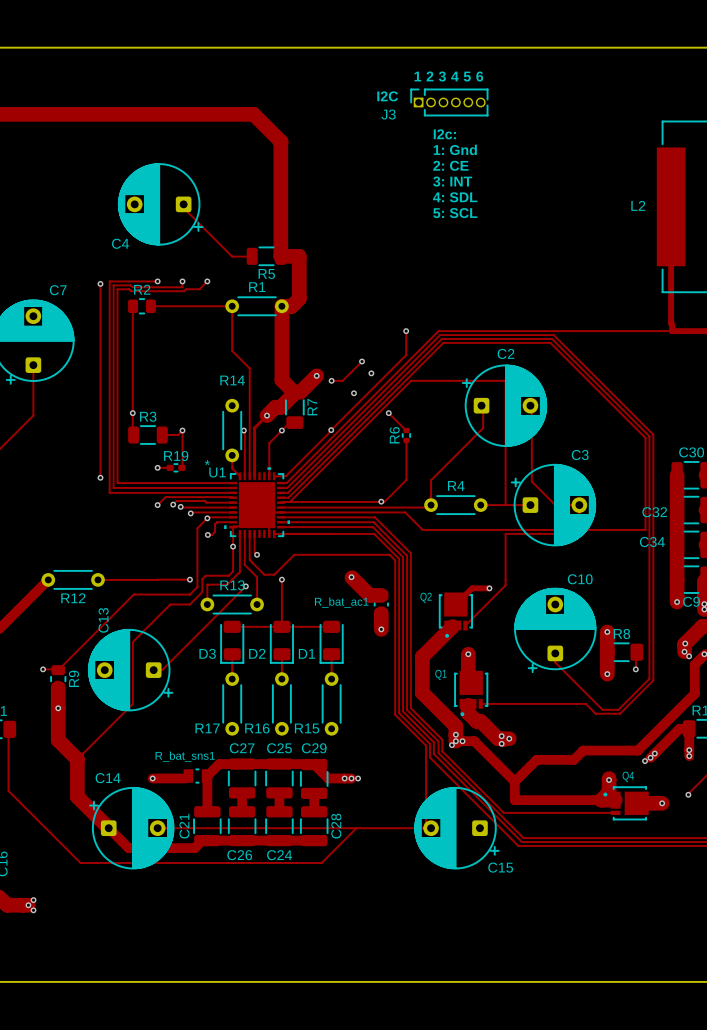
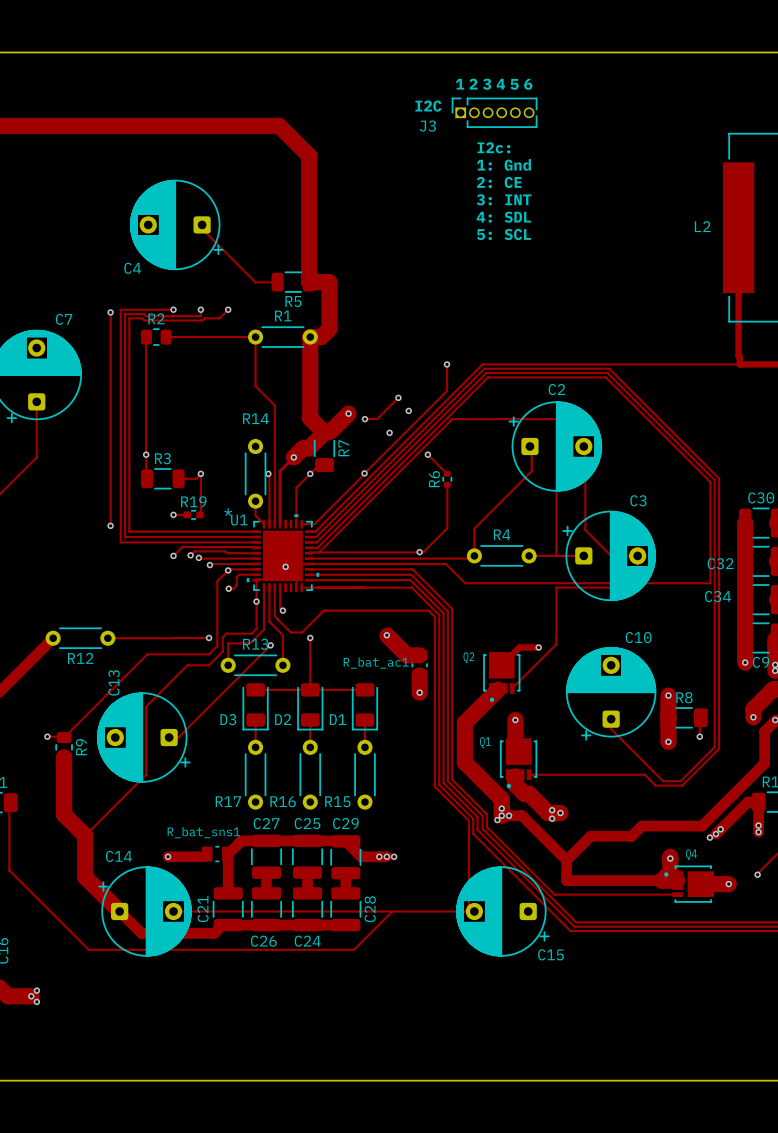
via: none -> (285, 566)
via: (685, 643) -> none
via: (689, 656) -> none
via: (58, 708) -> none

